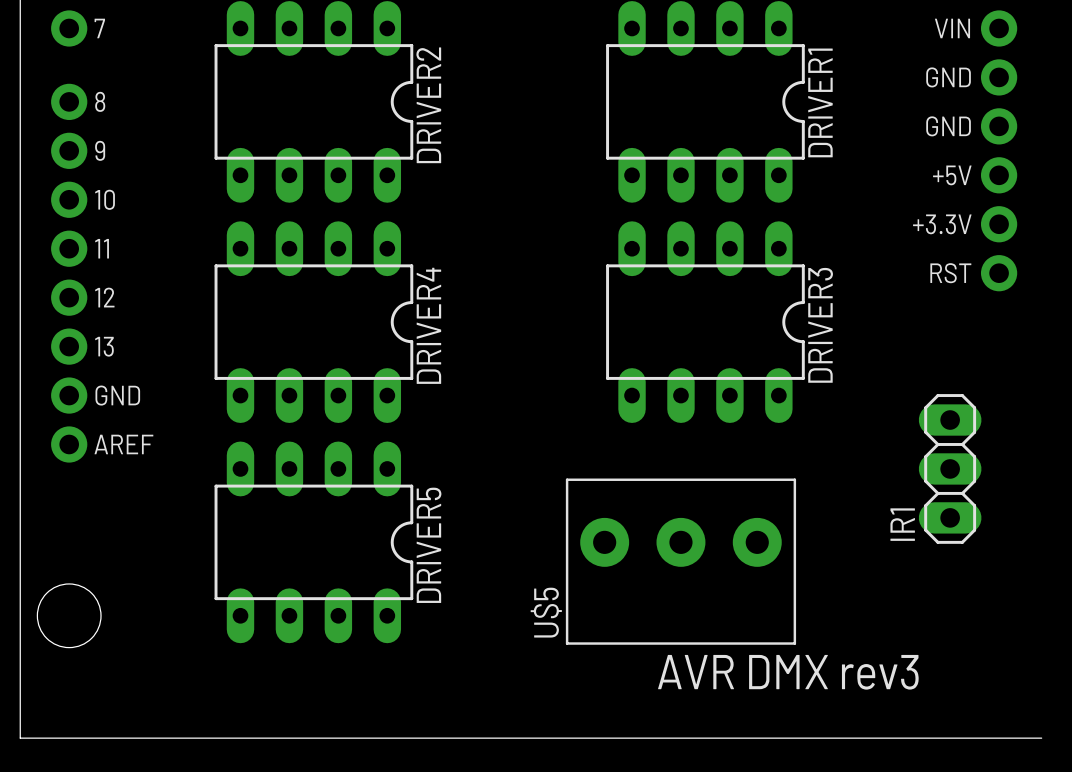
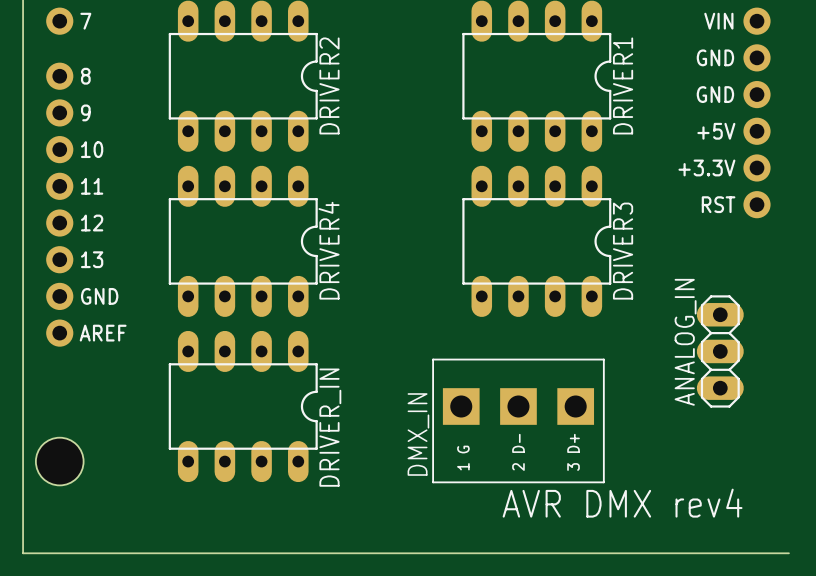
IR1 name: IR1 (902, 524) -> ANALOG_IN (685, 342)
DRIVER5 name: DRIVER5 (429, 545) -> DRIVER_IN (330, 427)
U$5: (680, 561) -> none
DMX_IN: none -> (518, 420)
text: AVR DMX rev3 (788, 672) -> AVR DMX rev4 (622, 503)

